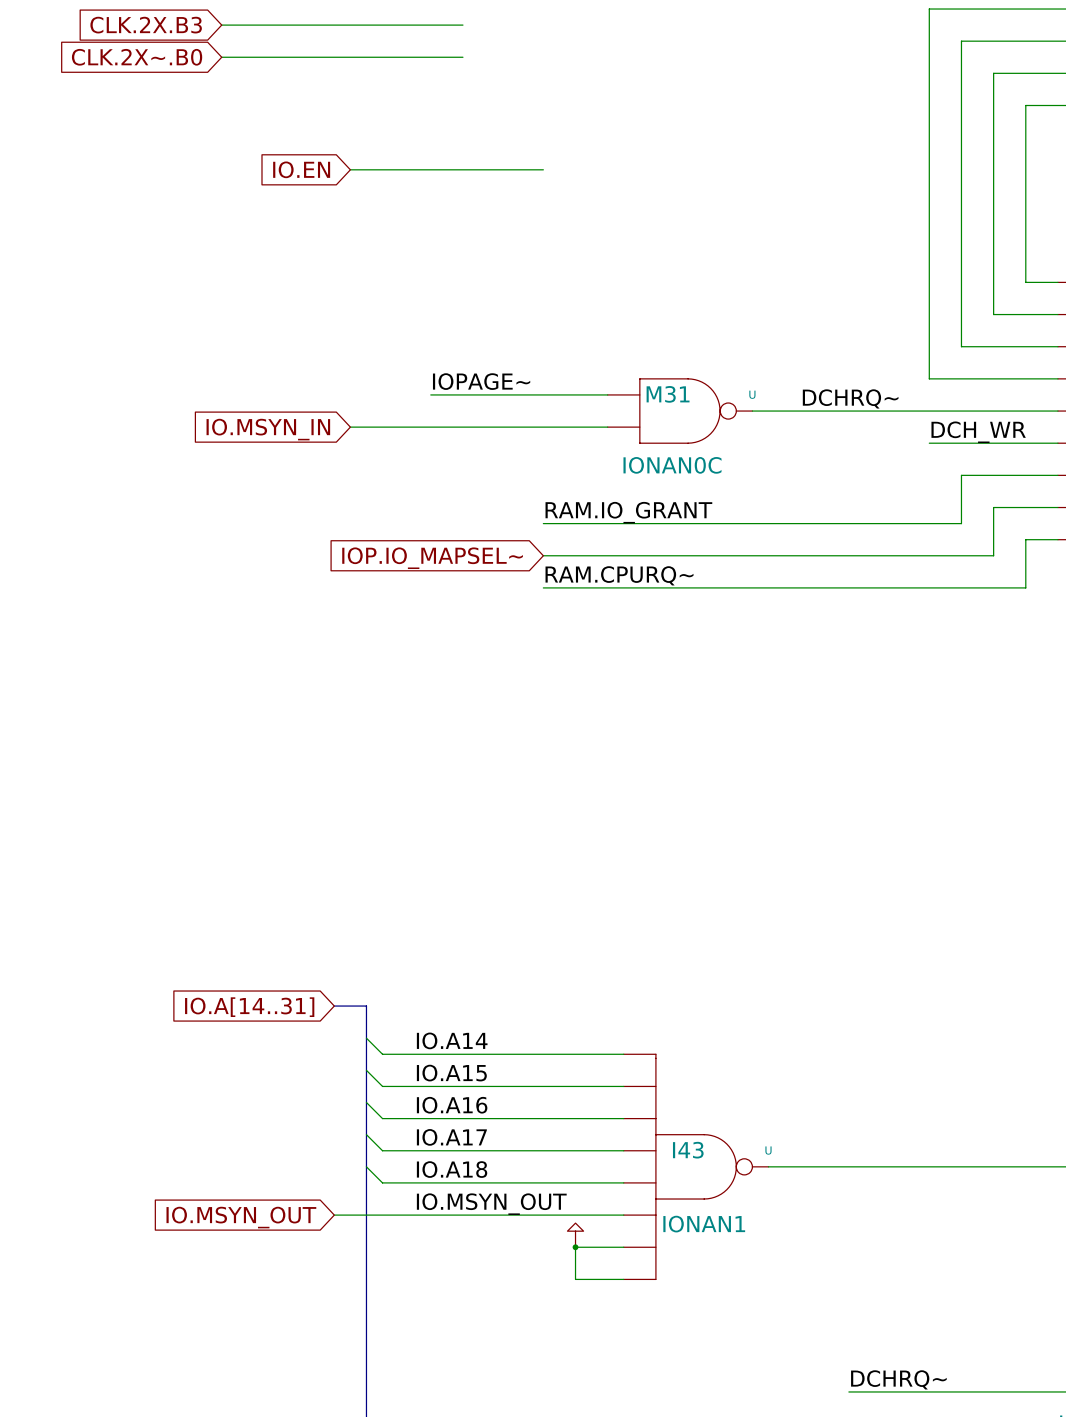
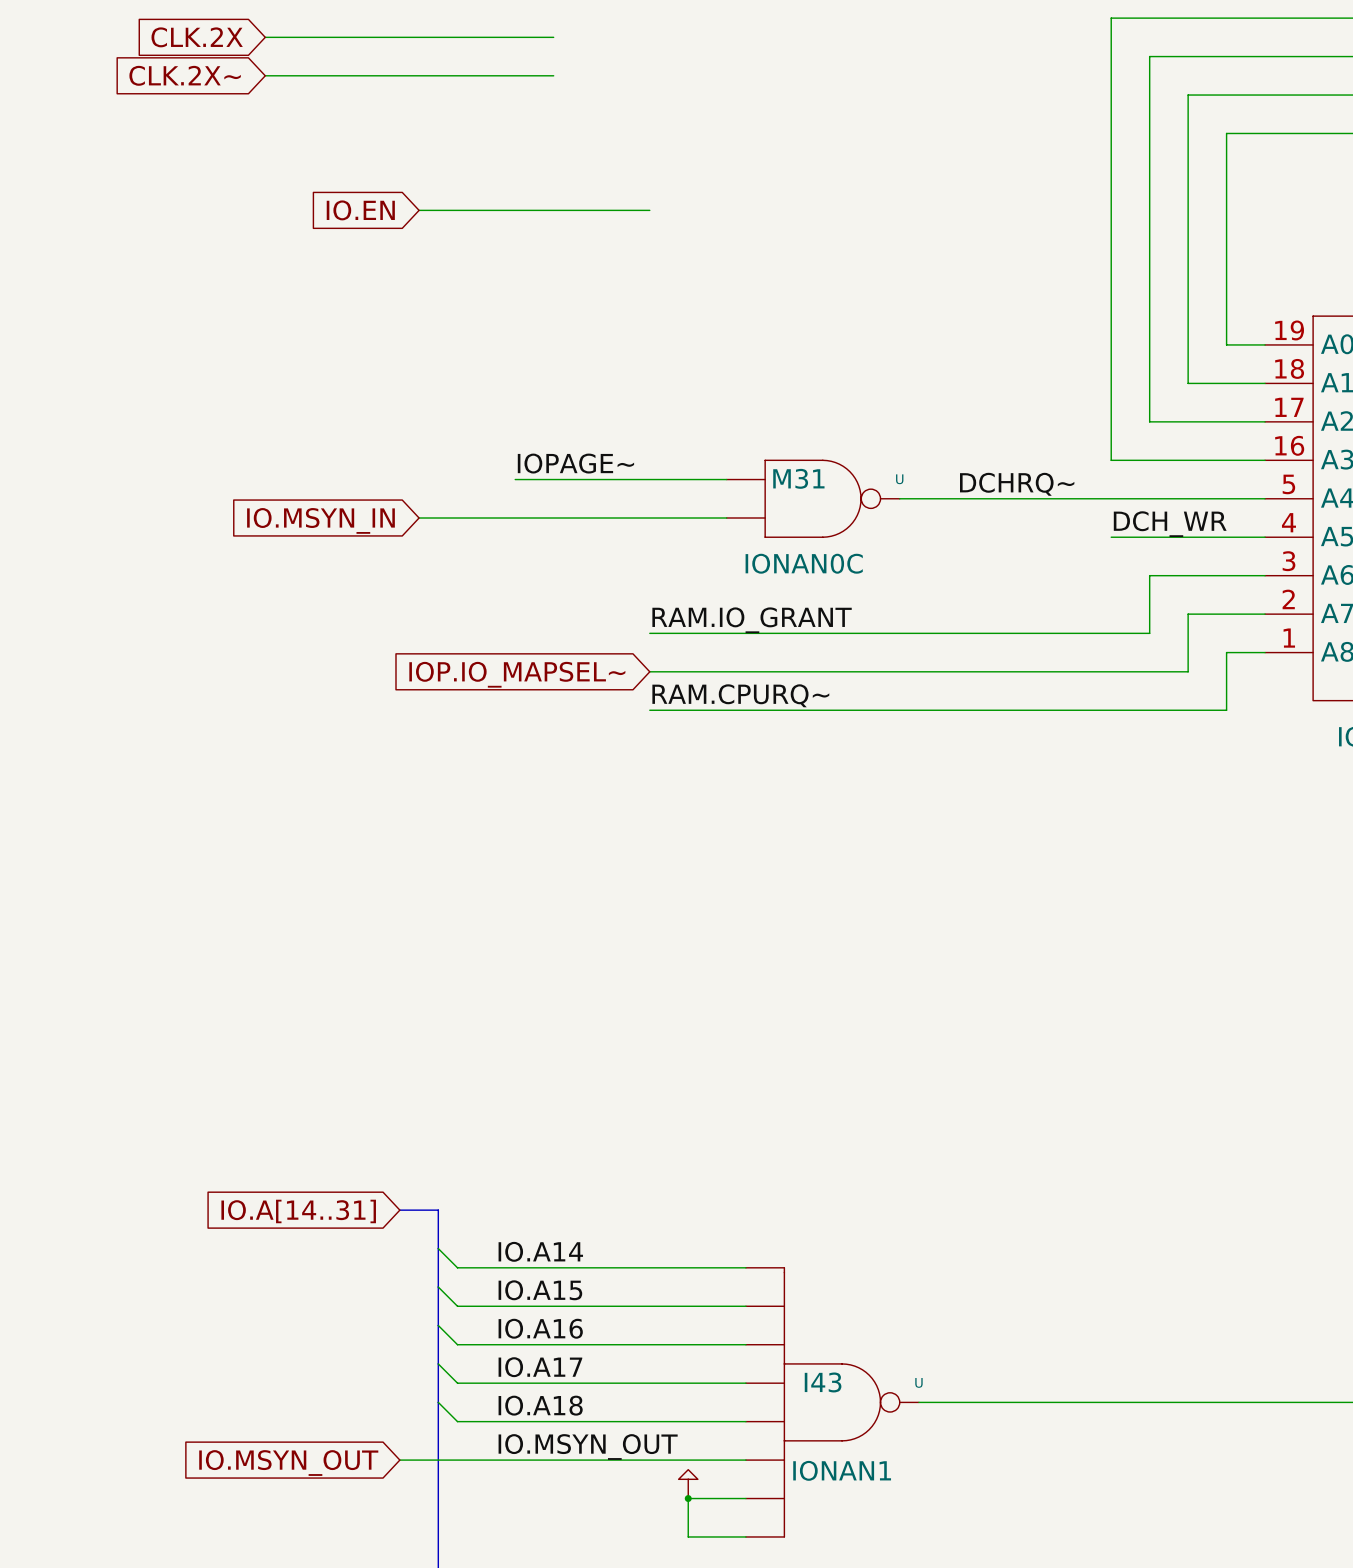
global label: CLK.2X.B3 (146, 25) -> CLK.2X (197, 37)
global label: CLK.2X~.B0 (137, 57) -> CLK.2X~ (185, 75)

